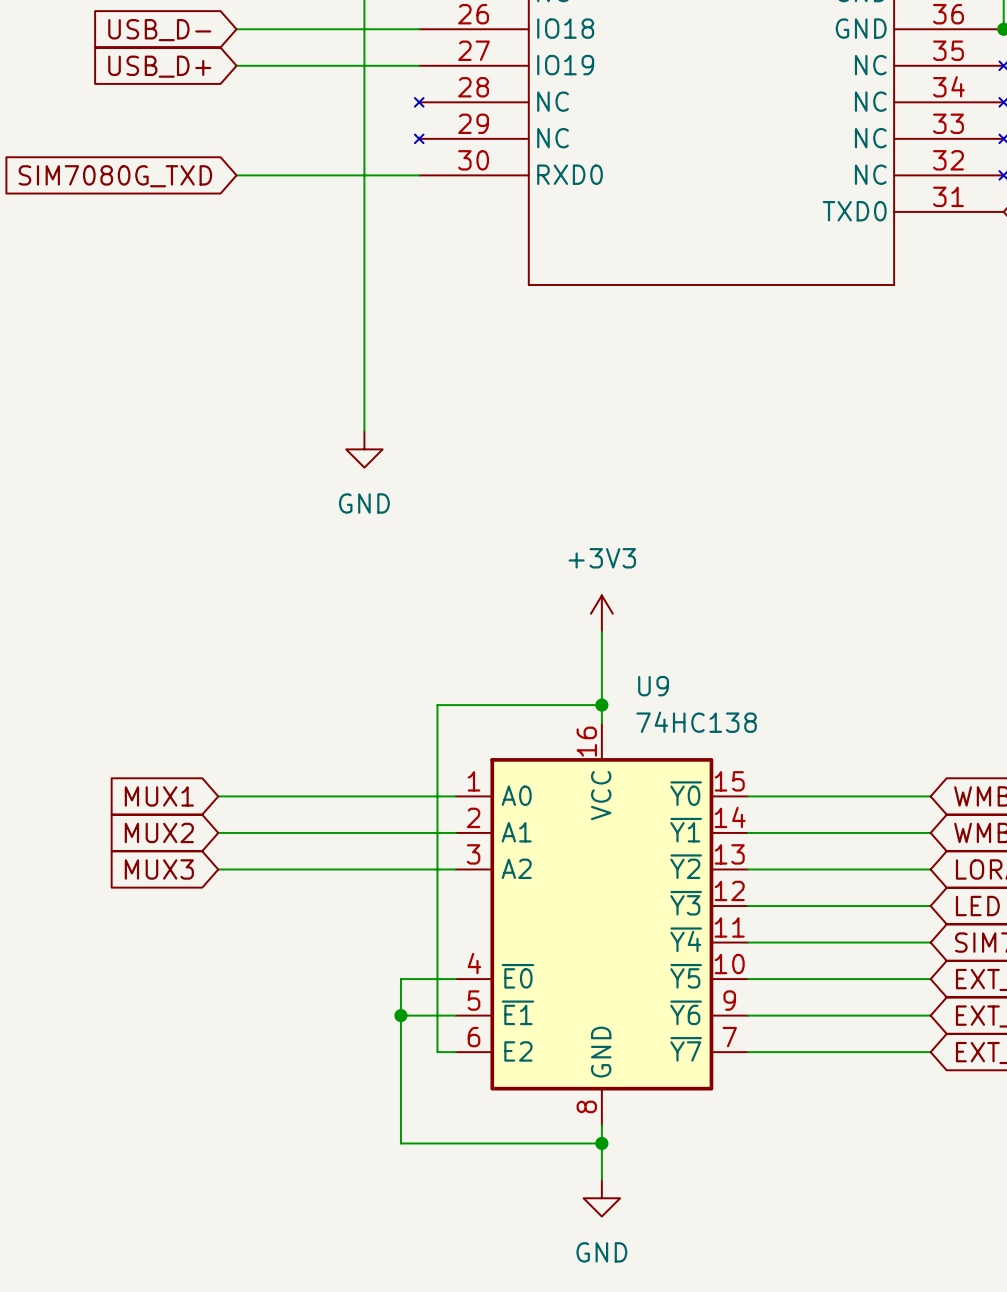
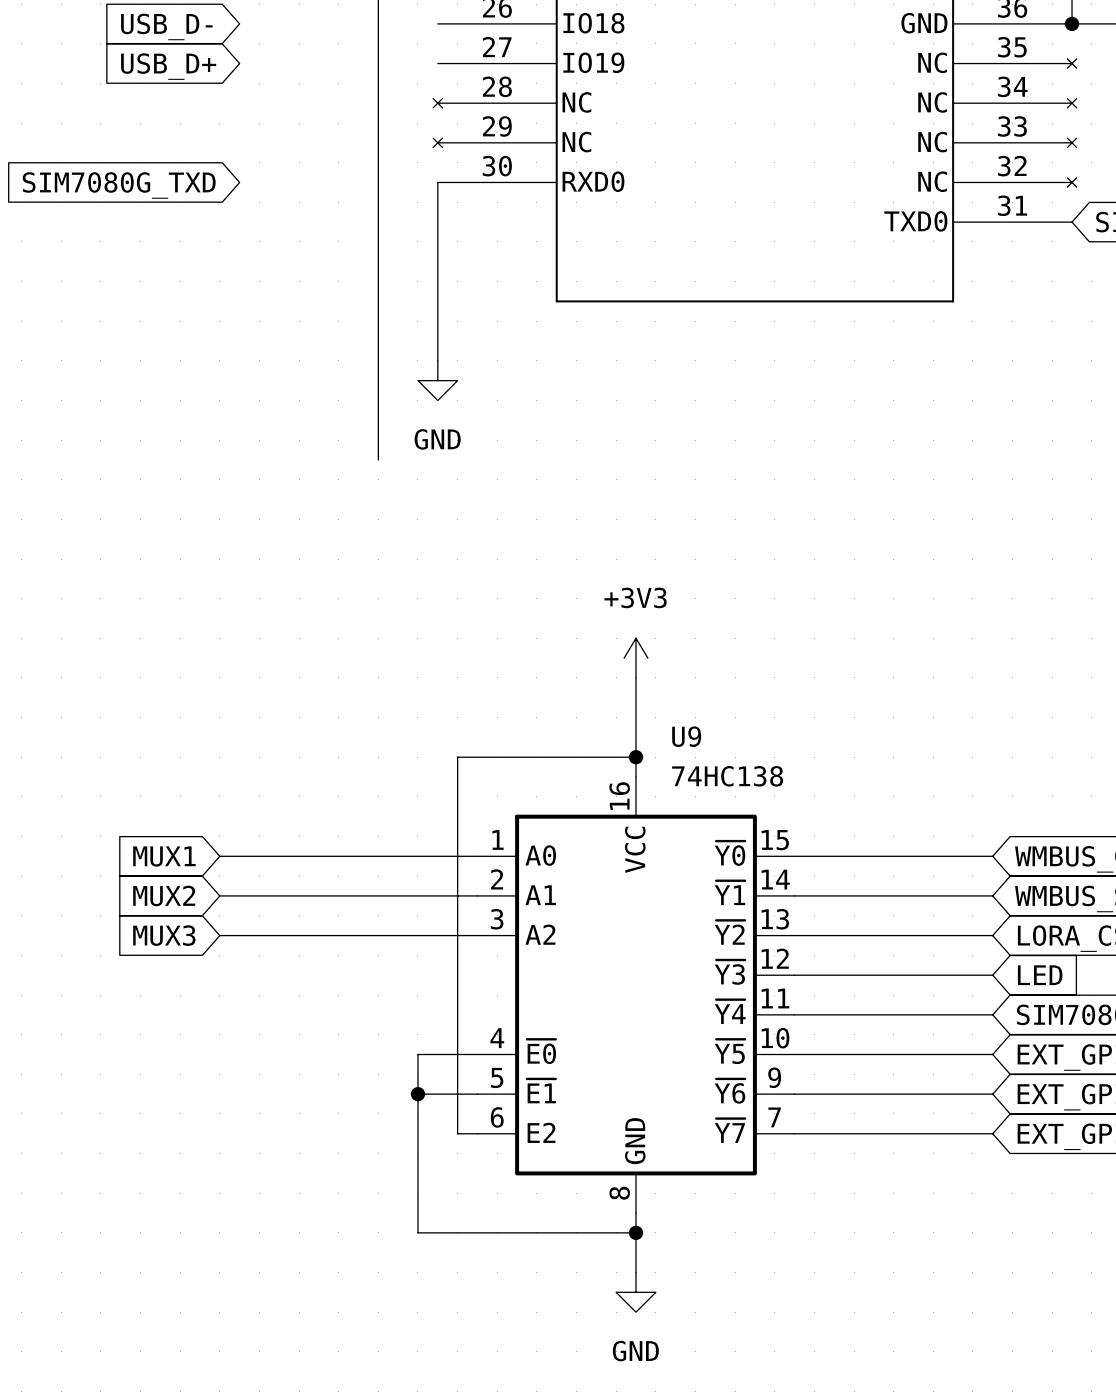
wire: (236, 29) (419, 29) -> none
wire: (236, 65) (419, 65) -> none
wire: (236, 175) (419, 175) -> (437, 360) (437, 182)
power symbol position: GND (364, 449) -> GND (437, 380)

